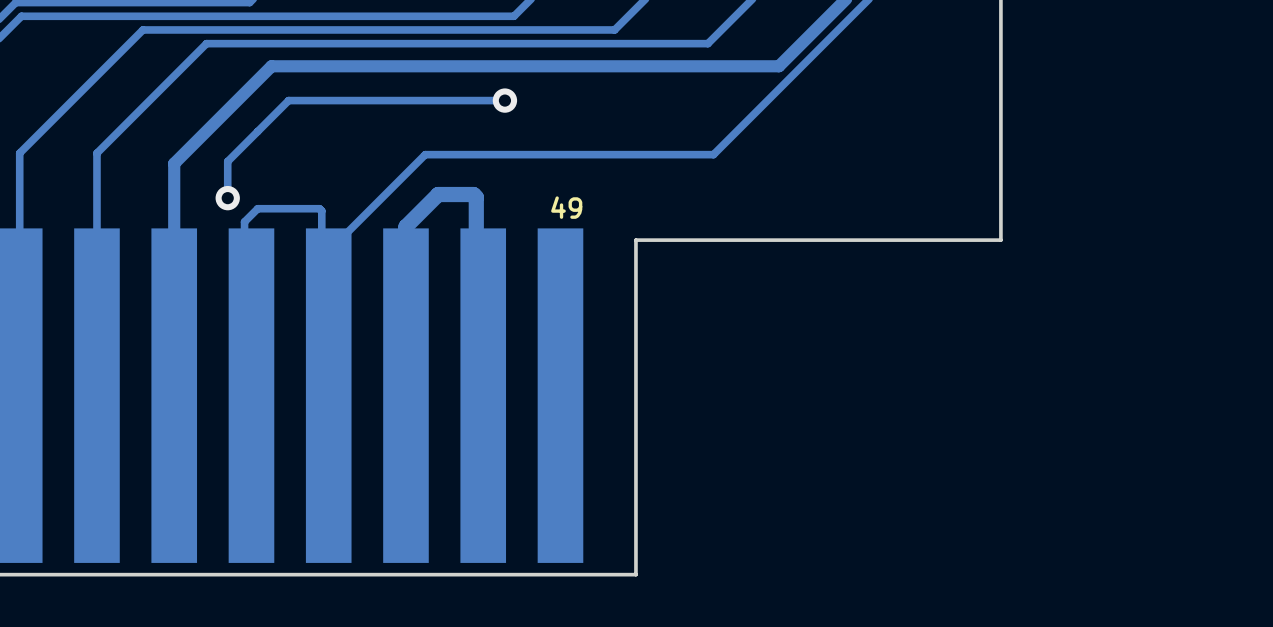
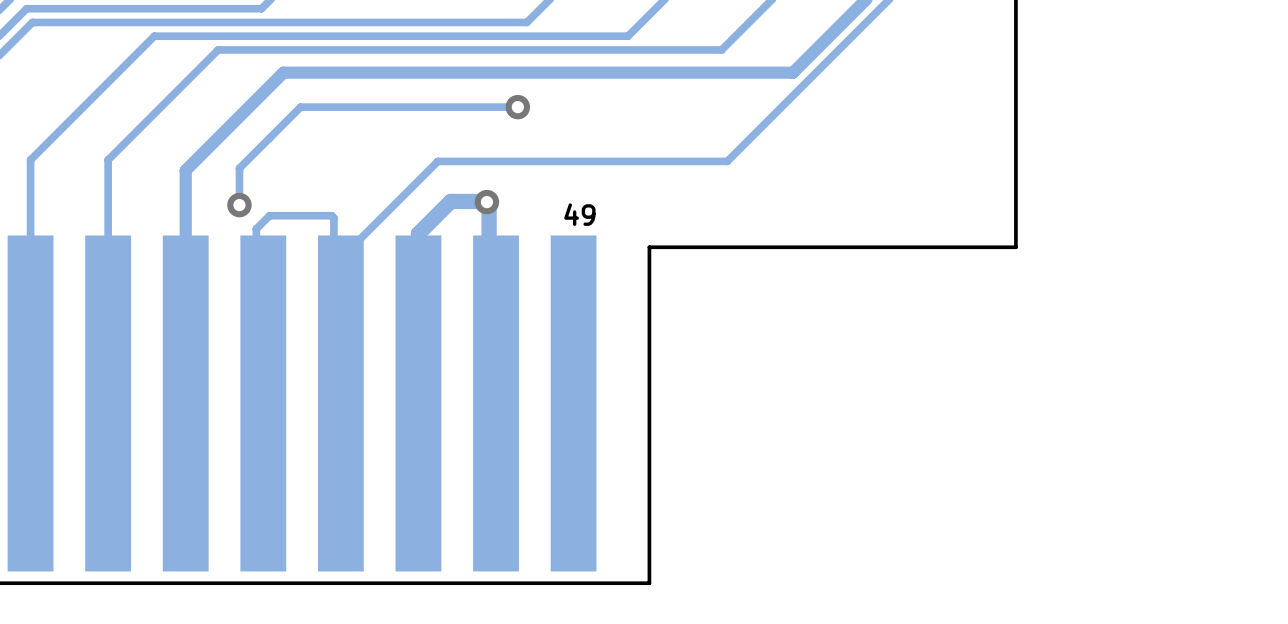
via: none -> (486, 202)

